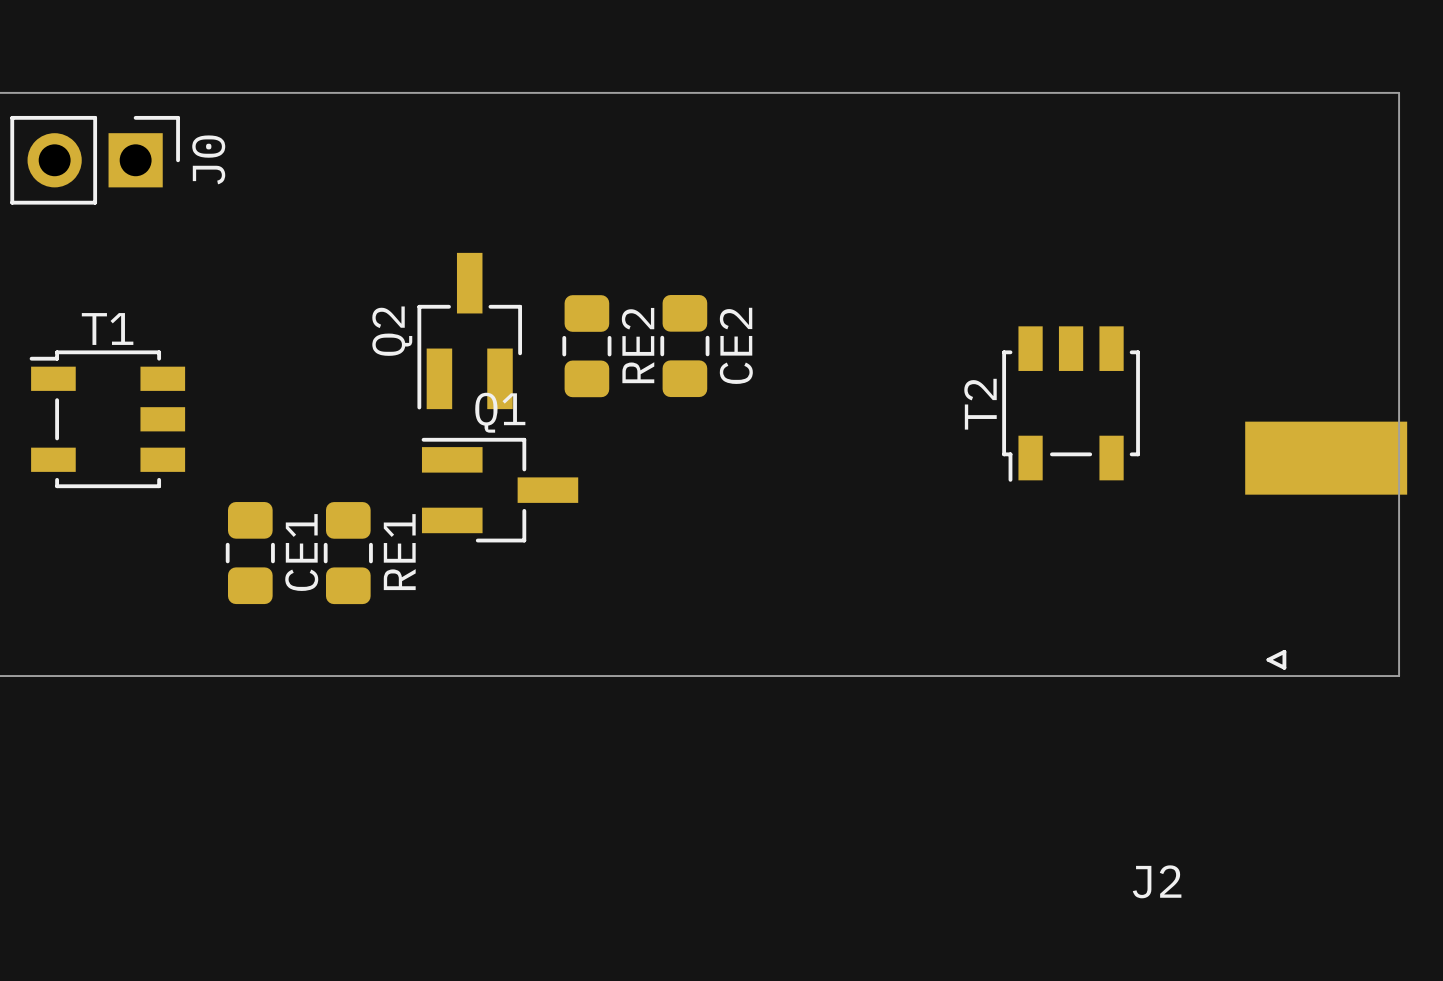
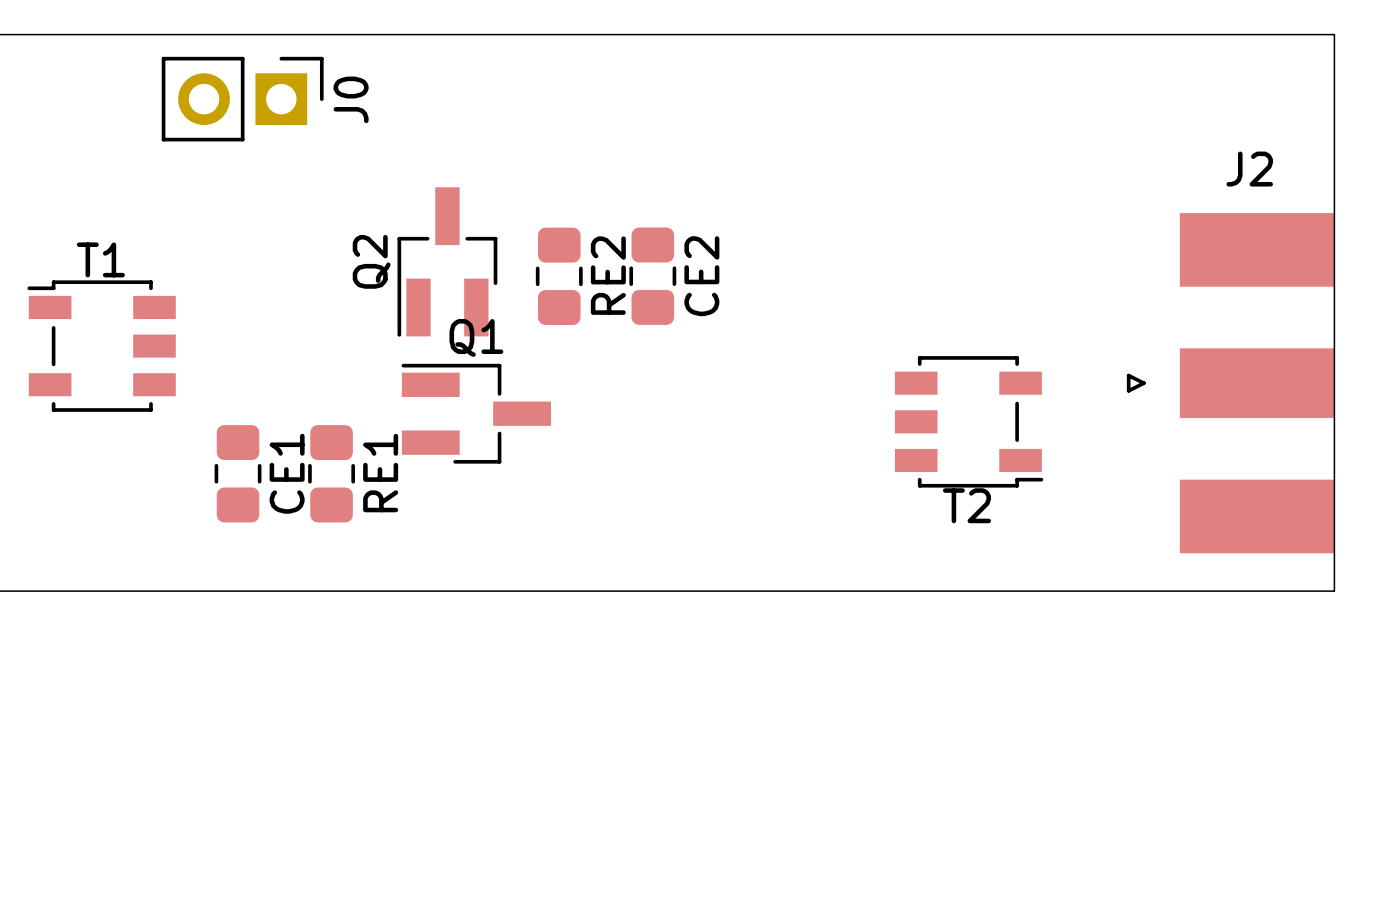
J0 position: (95, 160) -> (242, 99)
T2 rotation: 0° (1071, 404) -> 90° counterclockwise (969, 421)
T2 position: (1071, 404) -> (969, 421)
J2 footprint: [1245, 421, 1408, 670] -> [1126, 213, 1335, 554]
J2 name position: J2 (1157, 881) -> J2 (1249, 169)

